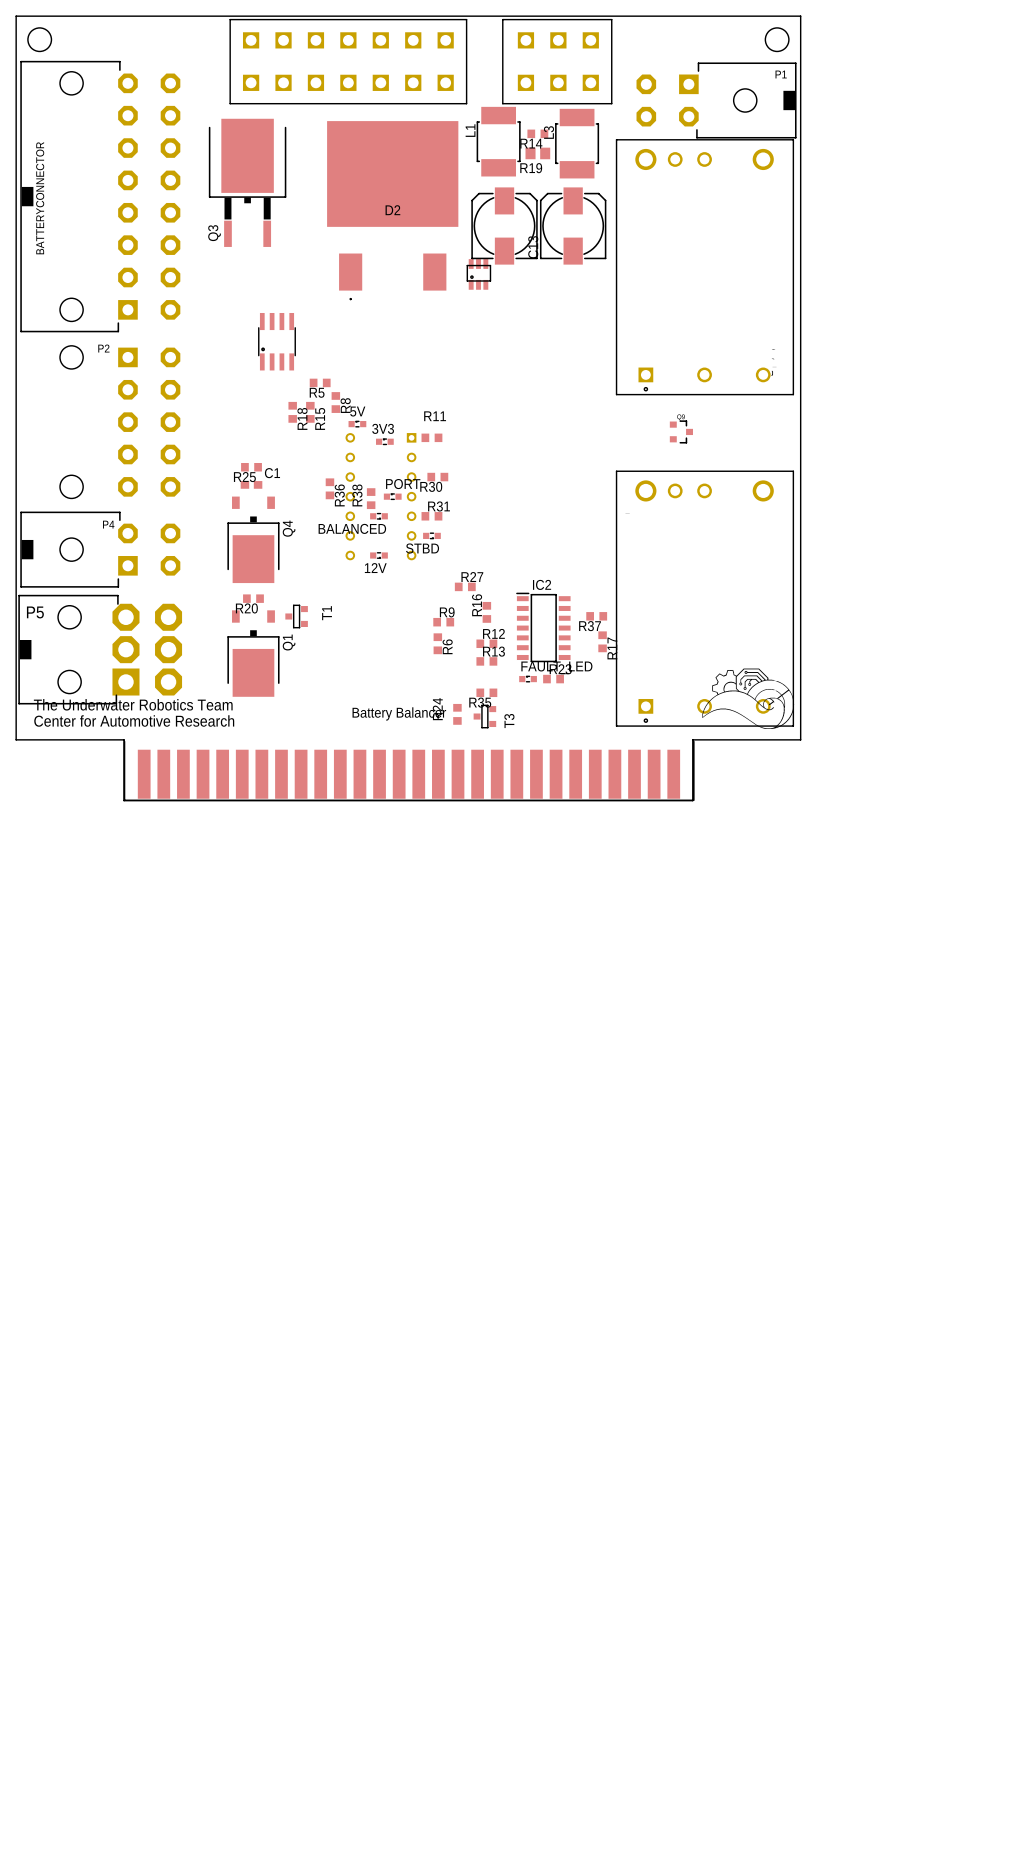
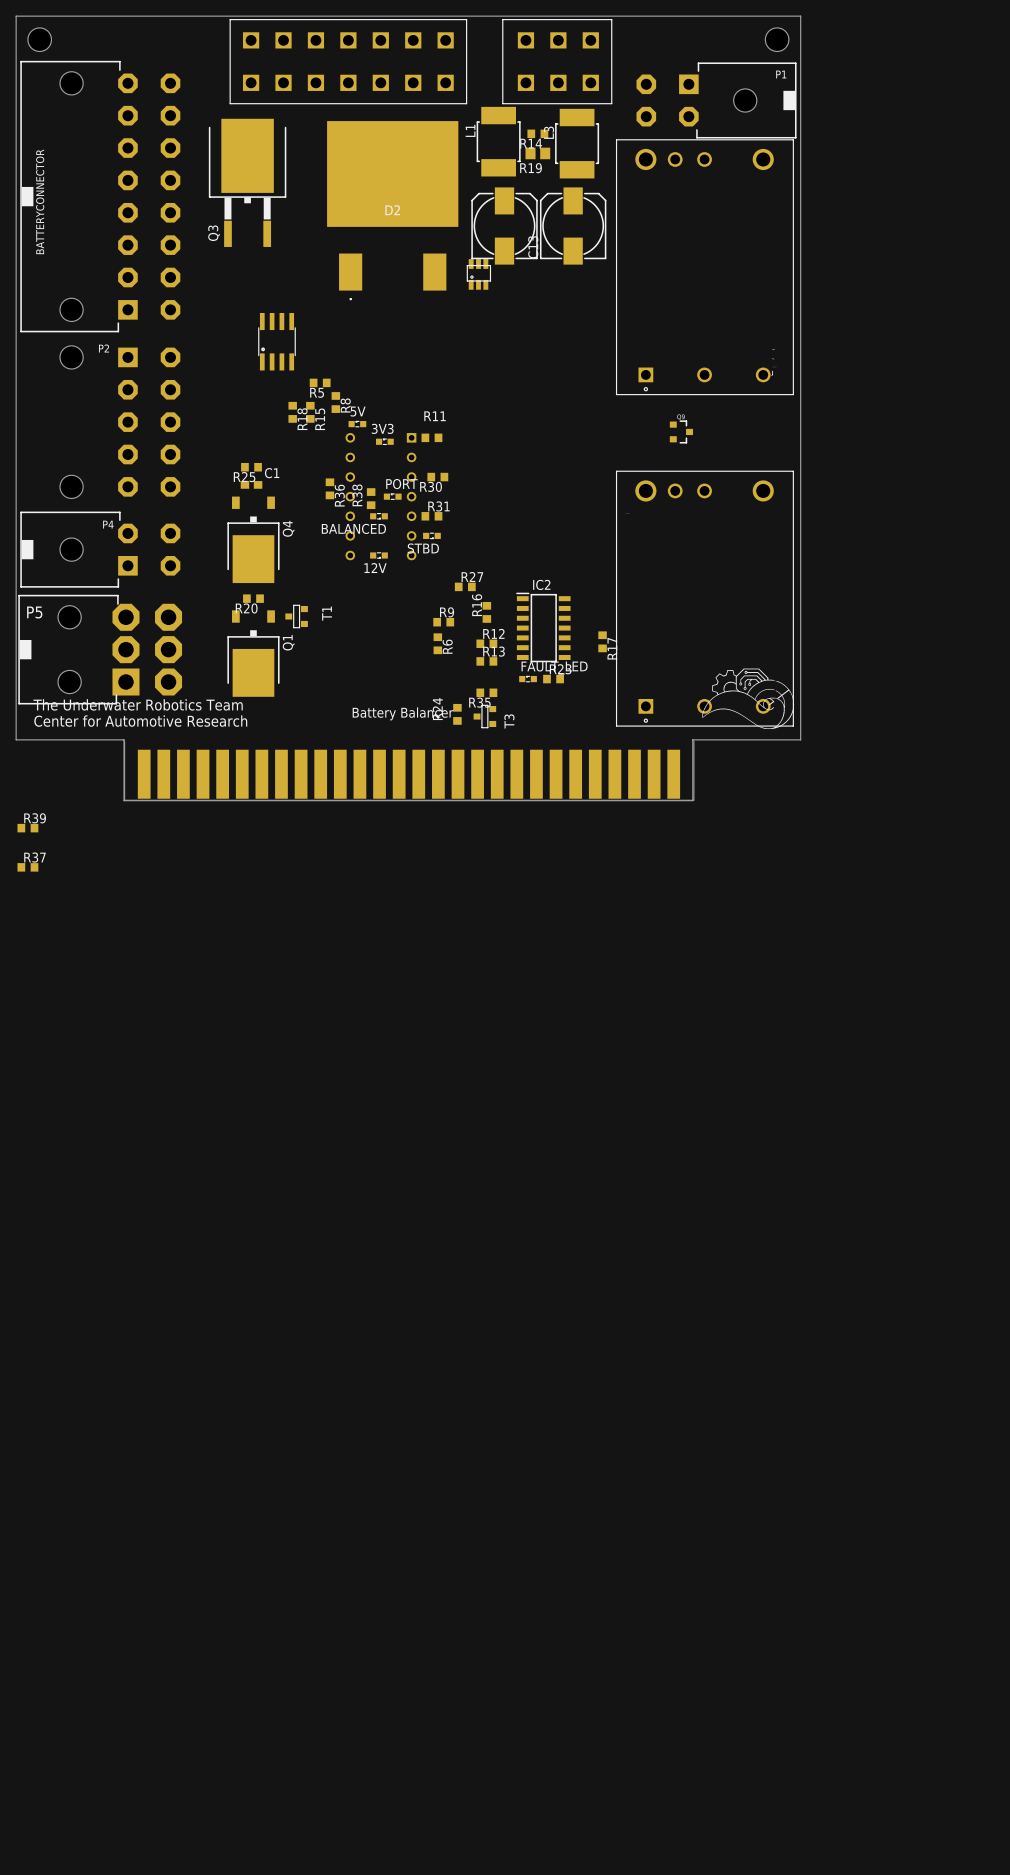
R37 position: (596, 616) -> (27, 867)
R37 name position: R37 (590, 626) -> R37 (35, 857)
R39: none -> (27, 828)

